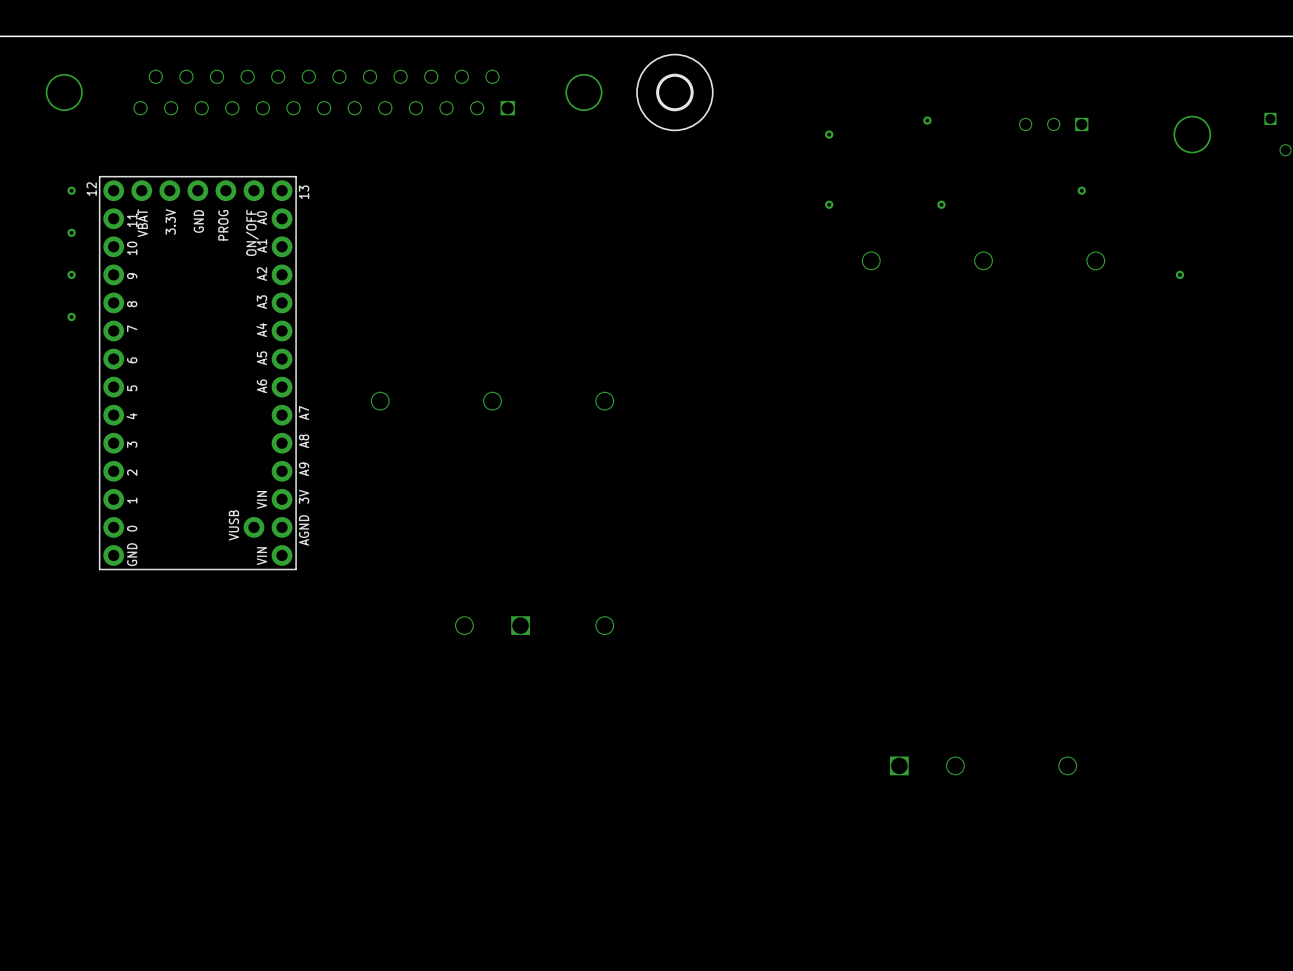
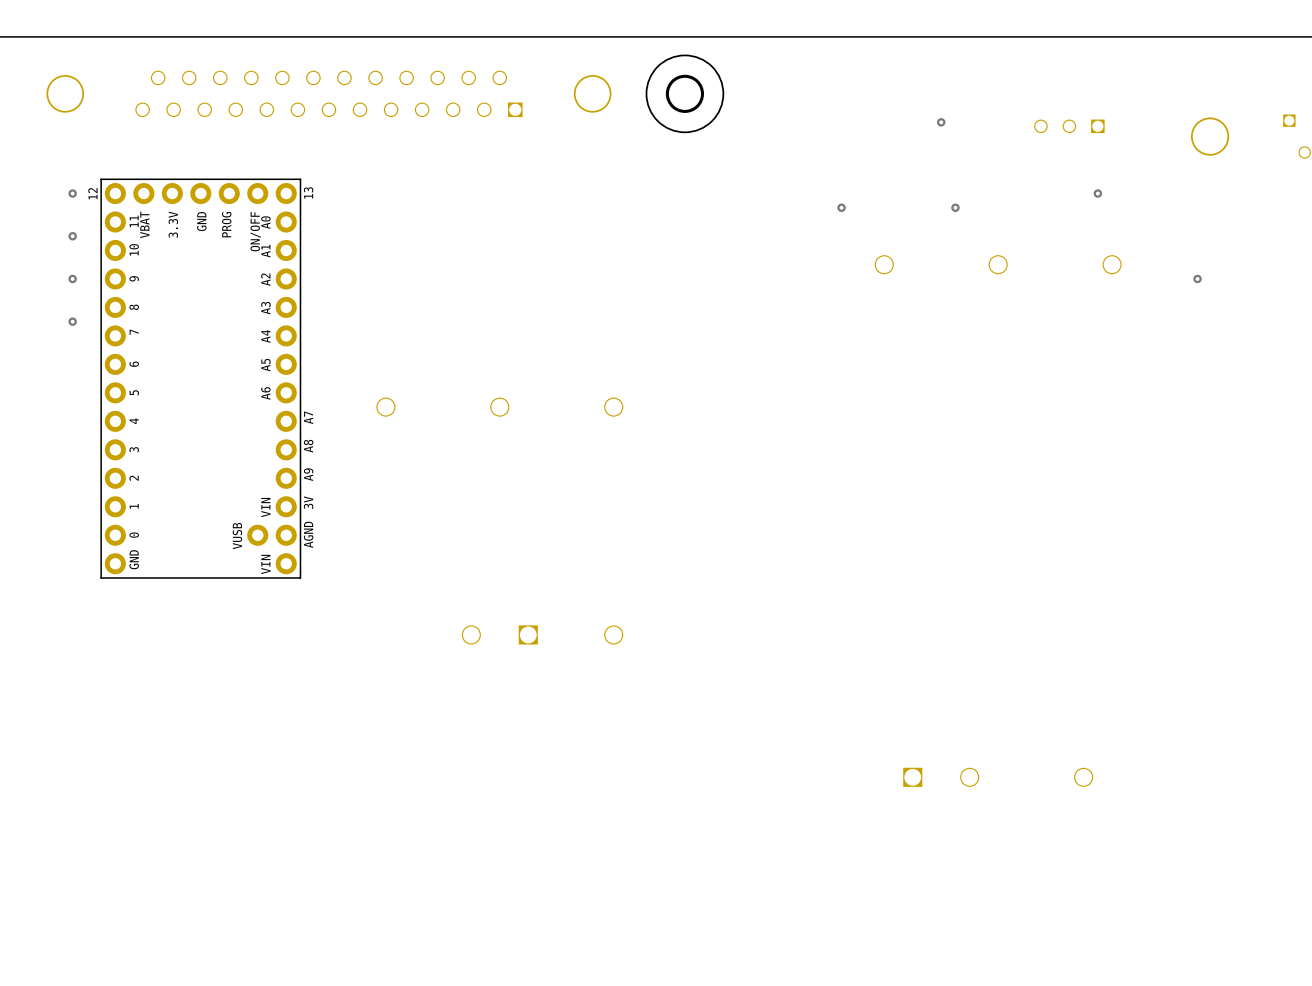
via: (829, 134) -> none

